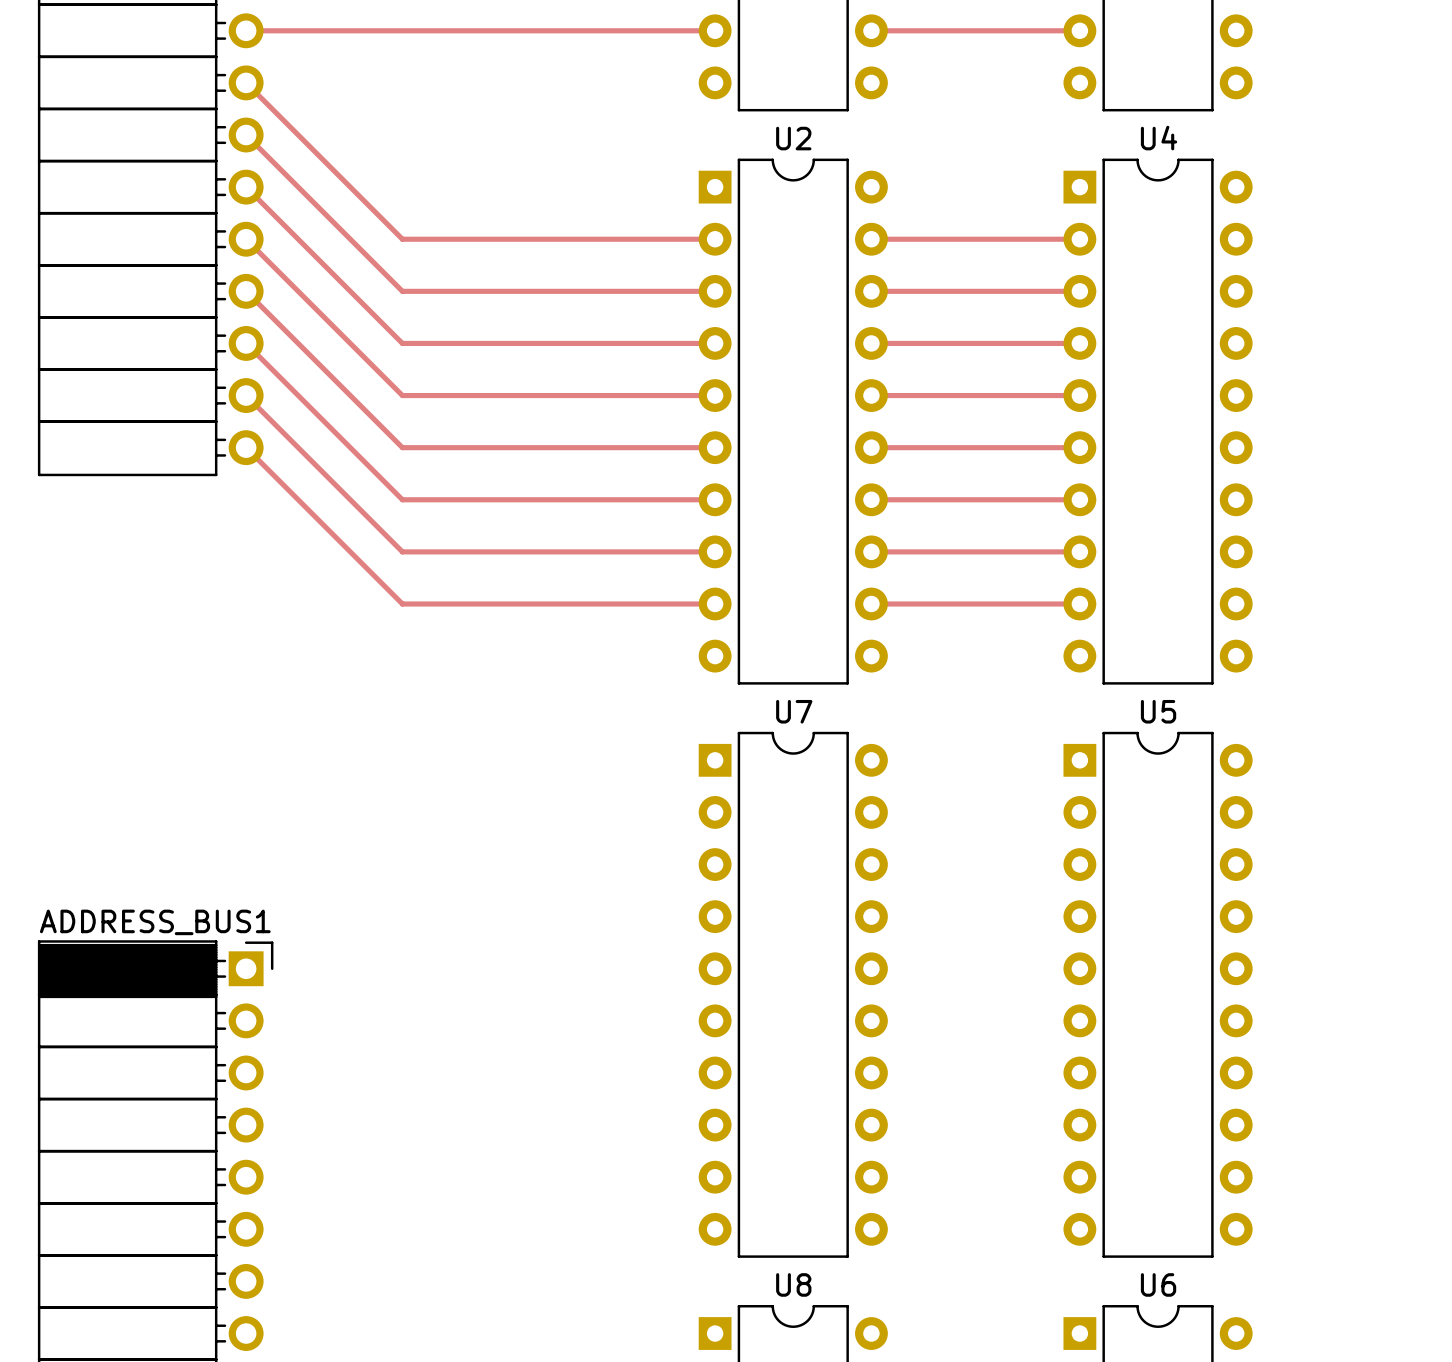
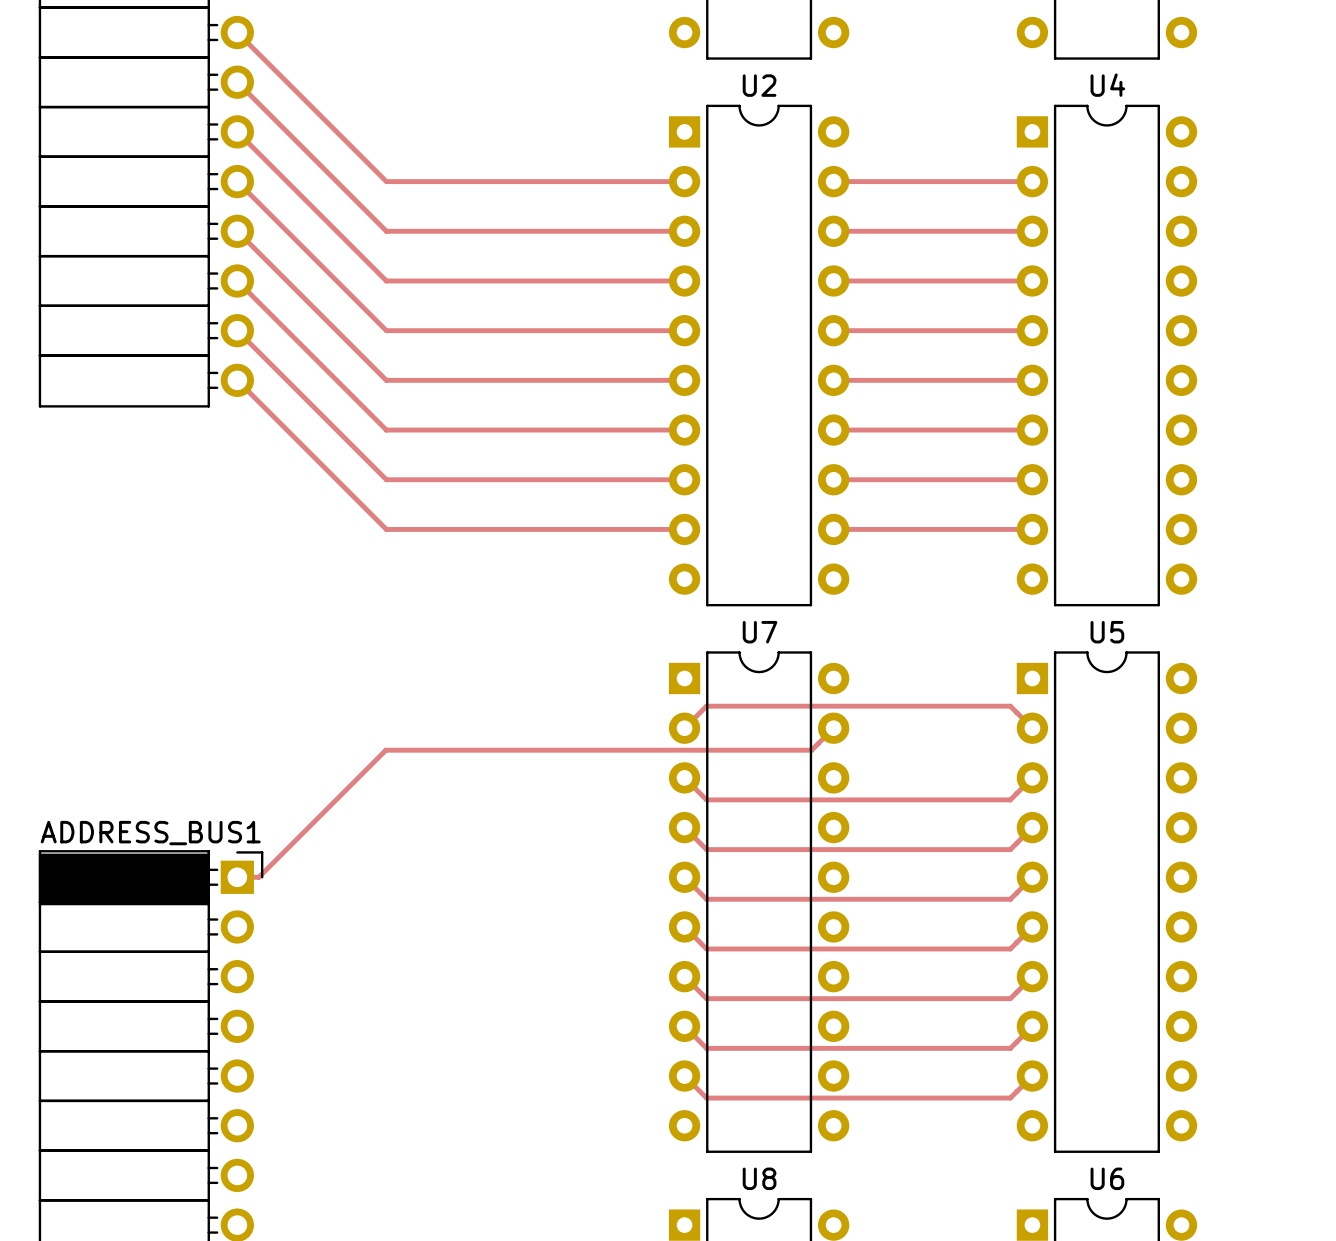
track: none -> (684, 728) (706, 706) (1010, 706) (1032, 728)
track: none -> (833, 728) (811, 750) (385, 750) (258, 877) (237, 877)
track: none -> (684, 777) (706, 799) (1010, 799) (1032, 777)
track: none -> (684, 827) (706, 849) (1010, 849) (1032, 827)
track: none -> (684, 877) (706, 899) (1010, 899) (1032, 877)
track: none -> (684, 926) (706, 948) (1010, 948) (1032, 926)
track: none -> (684, 976) (706, 998) (1010, 998) (1032, 976)
track: none -> (684, 1026) (706, 1048) (1010, 1048) (1032, 1026)
track: none -> (684, 1076) (706, 1098) (1010, 1098) (1032, 1076)

